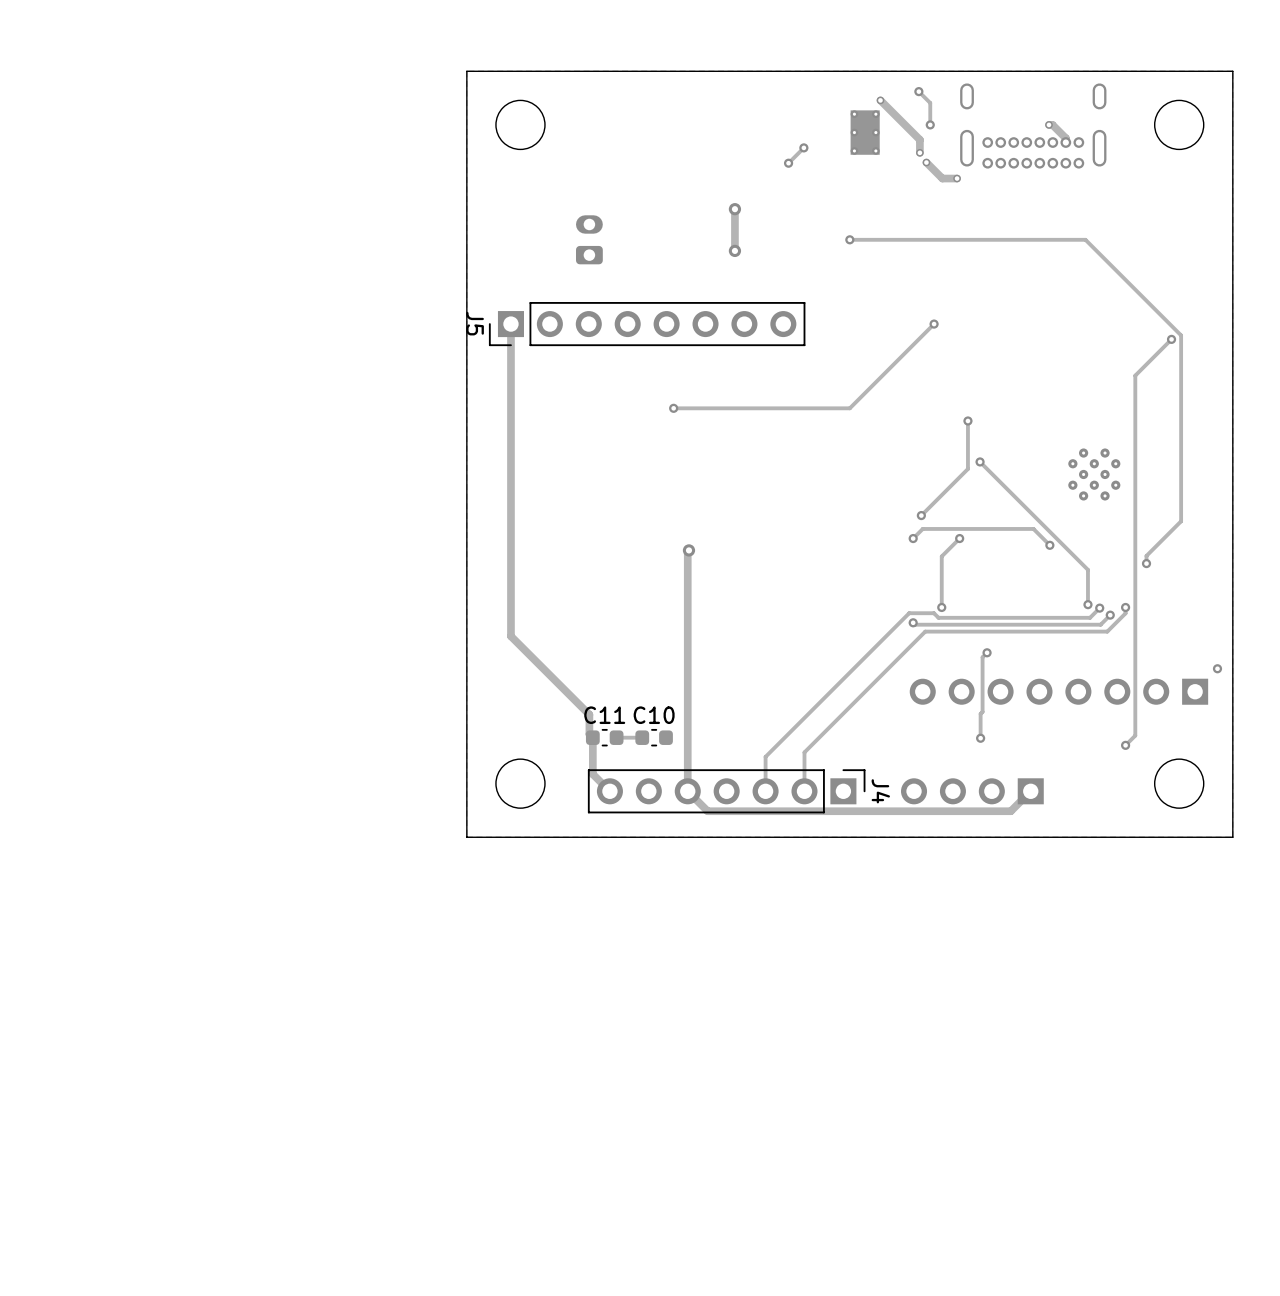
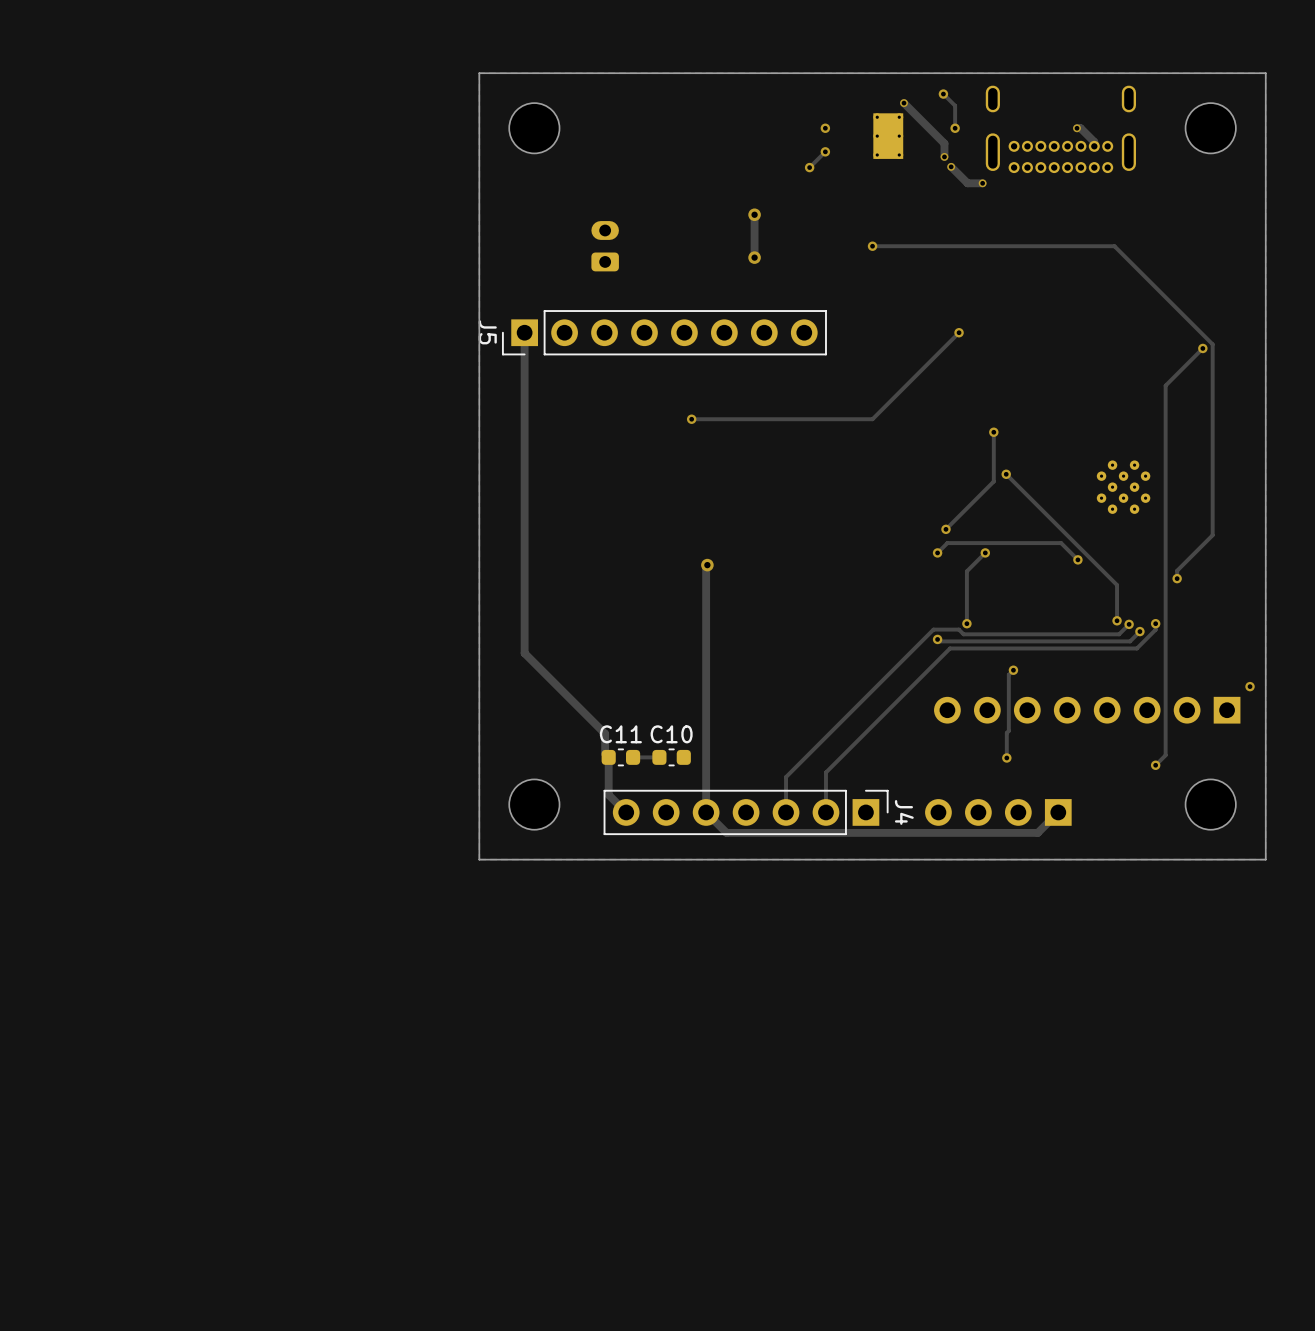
via: none -> (825, 128)

